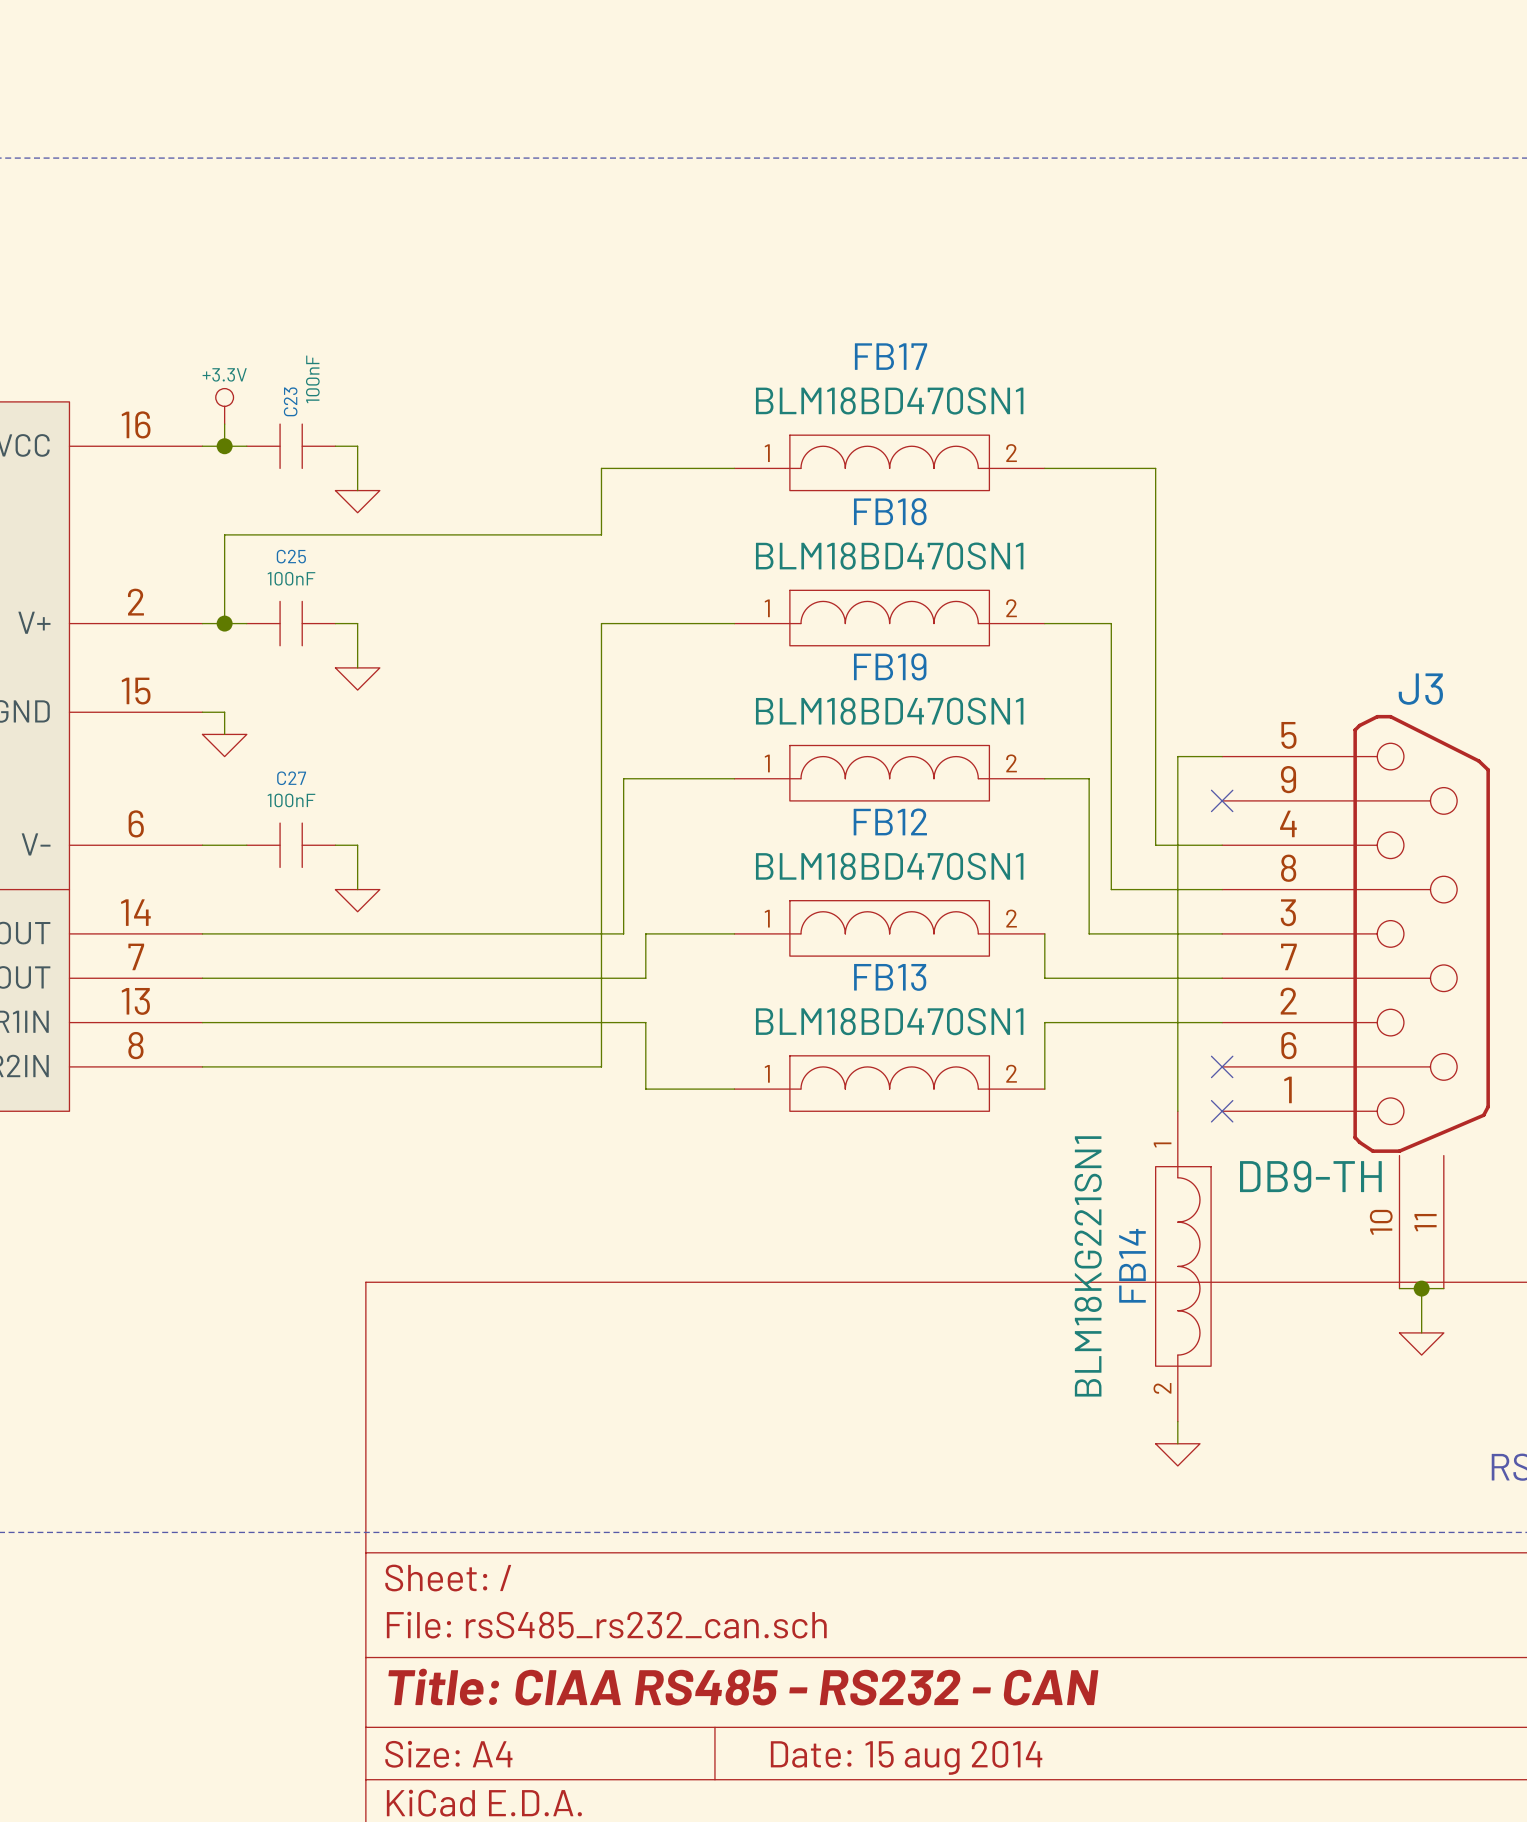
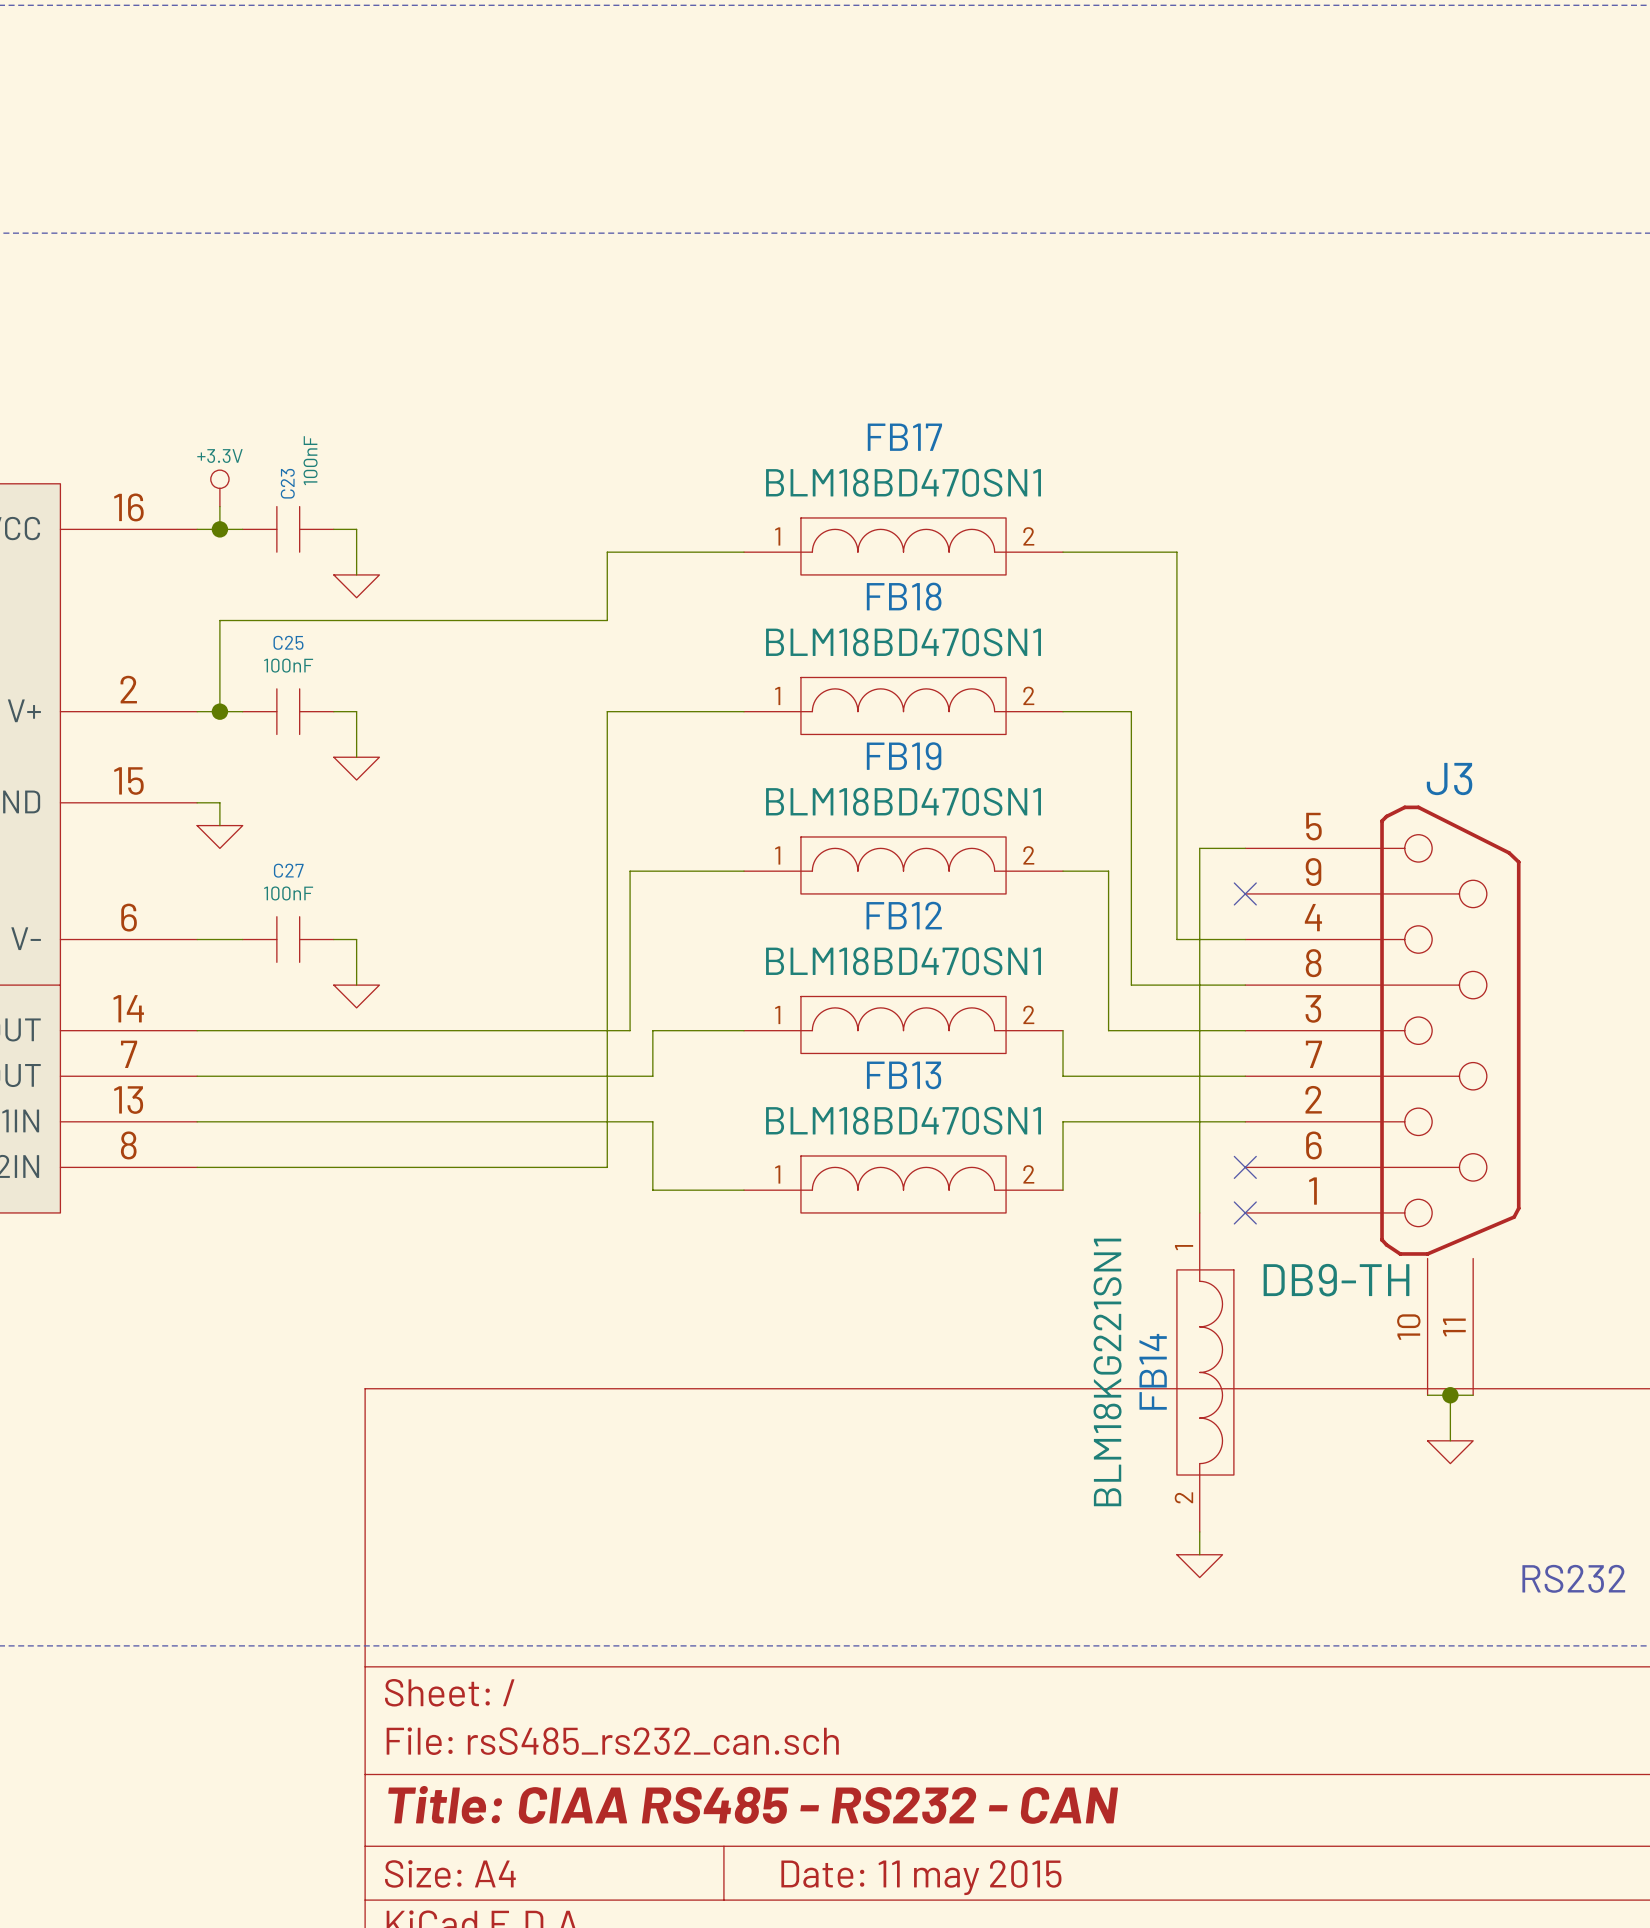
title block: Date: 15 aug 2014 (906, 1757) -> Date: 11 may 2015 (921, 1877)

